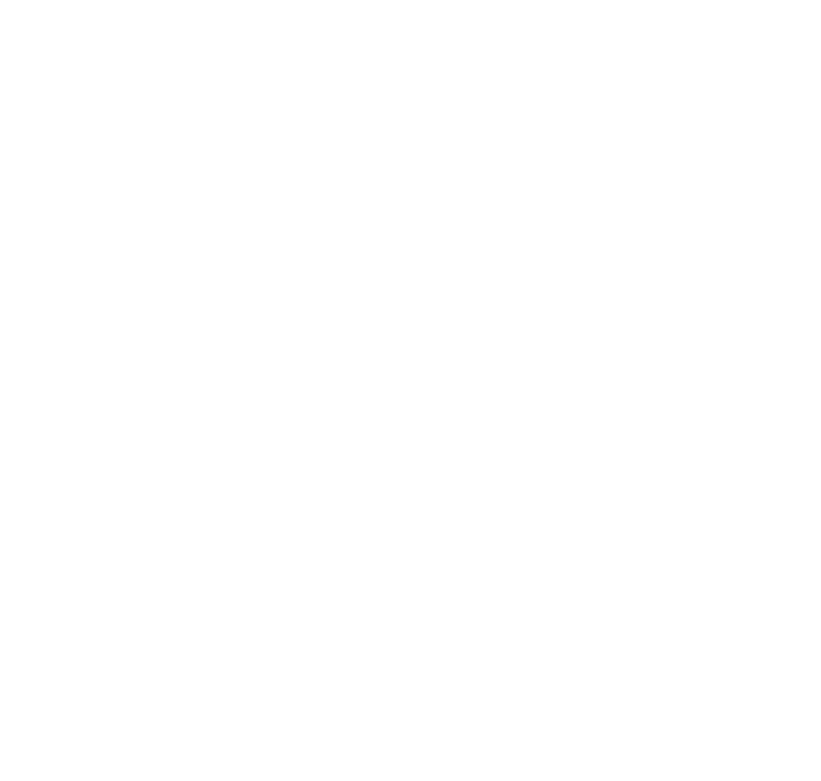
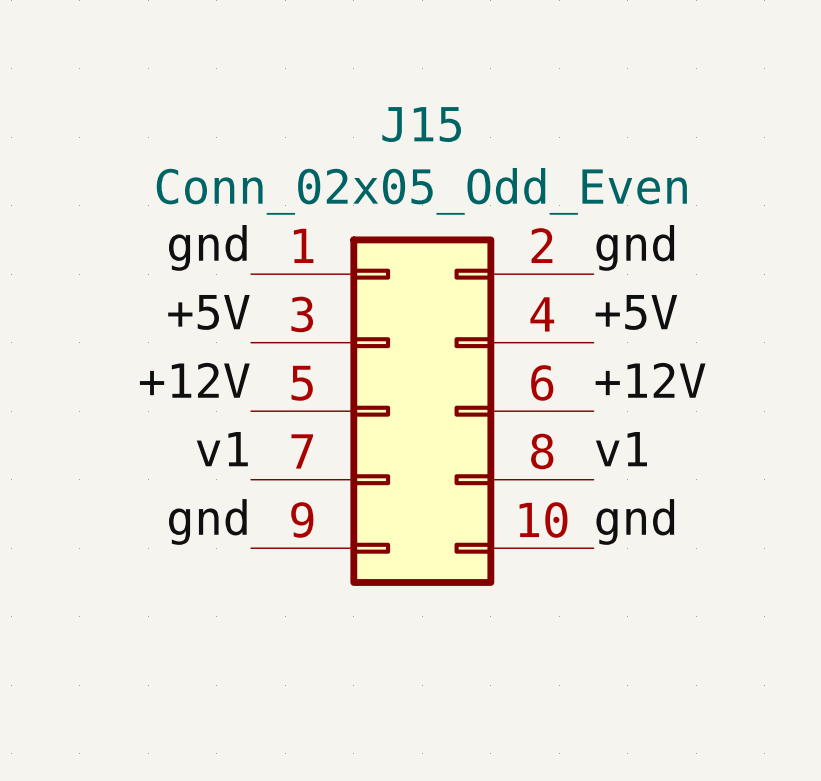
label: none -> gnd (207, 247)
label: none -> gnd (635, 247)
label: none -> +5V (208, 312)
label: none -> +5V (636, 312)
label: none -> +12V (194, 380)
label: none -> +12V (650, 380)
J15: none -> Conn_02x05_Odd_Even (422, 411)
label: none -> v1 (222, 449)
label: none -> v1 (621, 449)
label: none -> gnd (207, 521)
label: none -> gnd (635, 521)

